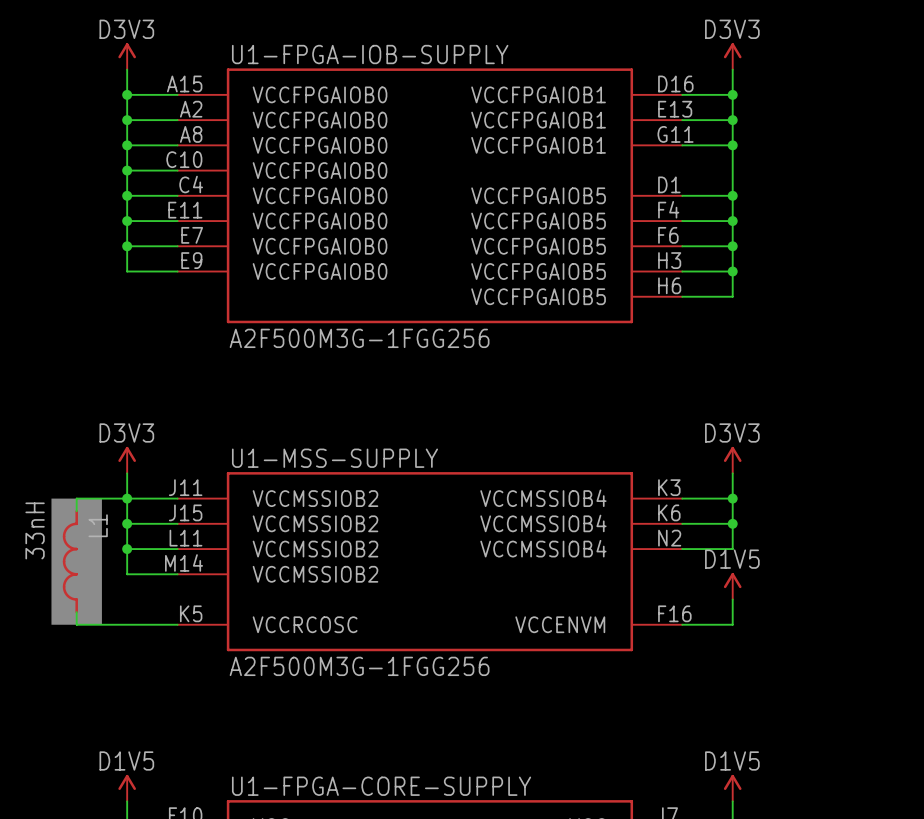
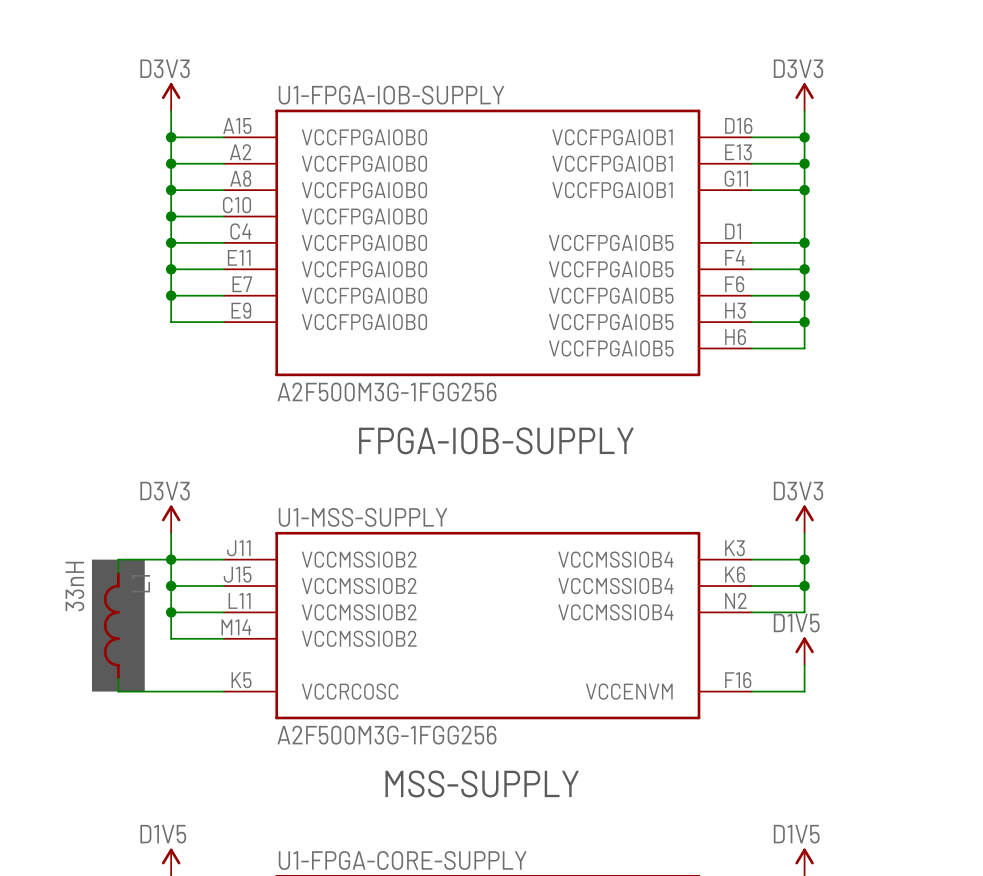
text: none -> FPGA-IOB-SUPPLY (496, 440)
text: none -> MSS-SUPPLY (482, 783)

